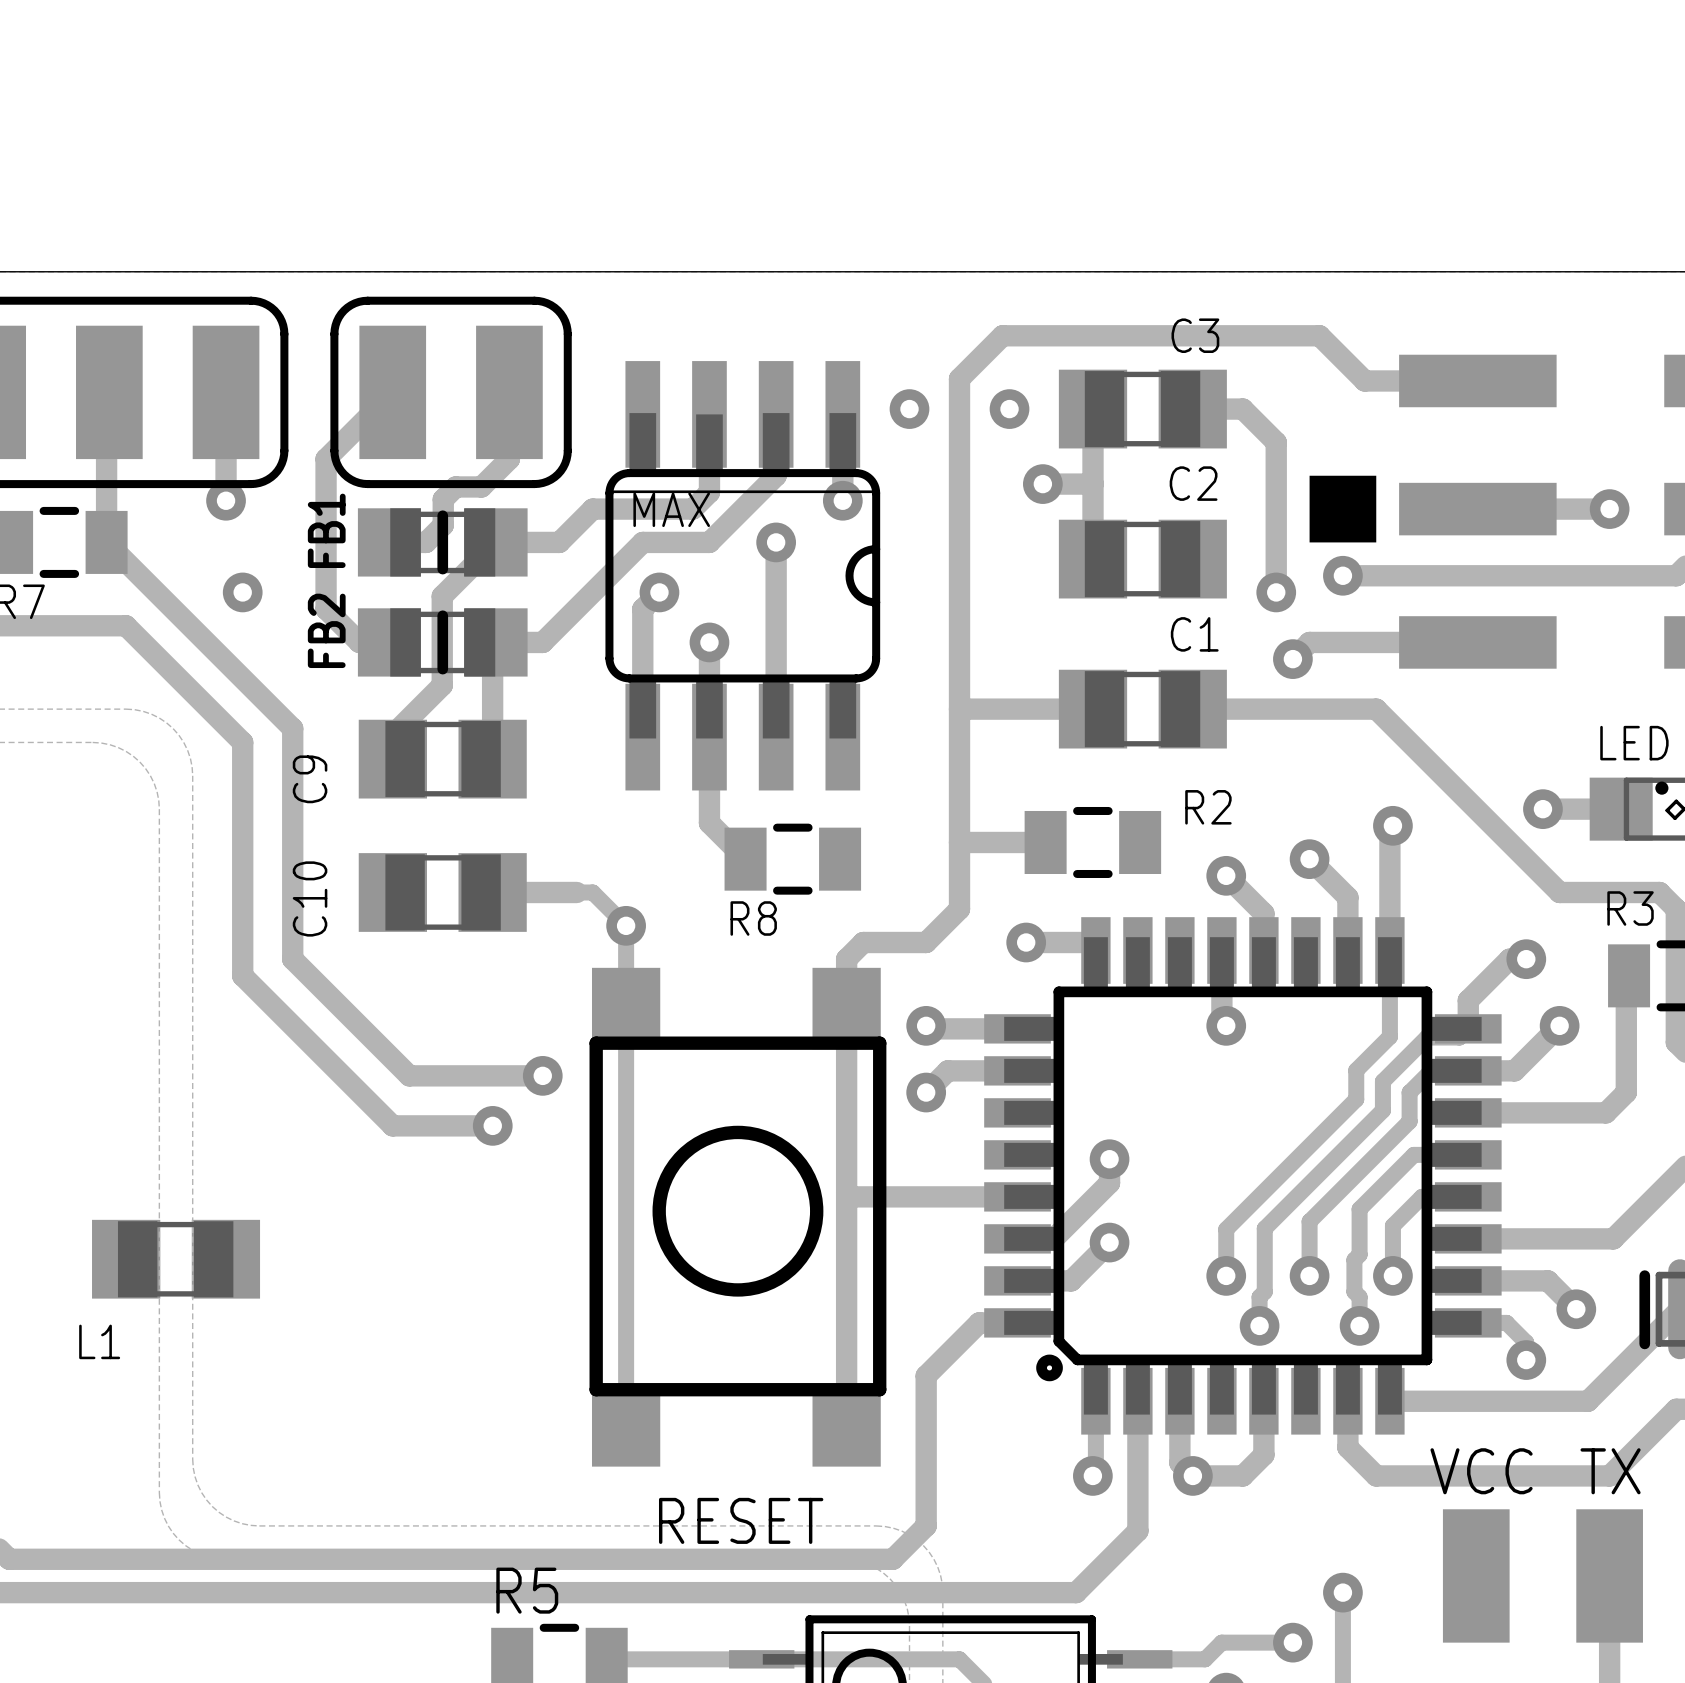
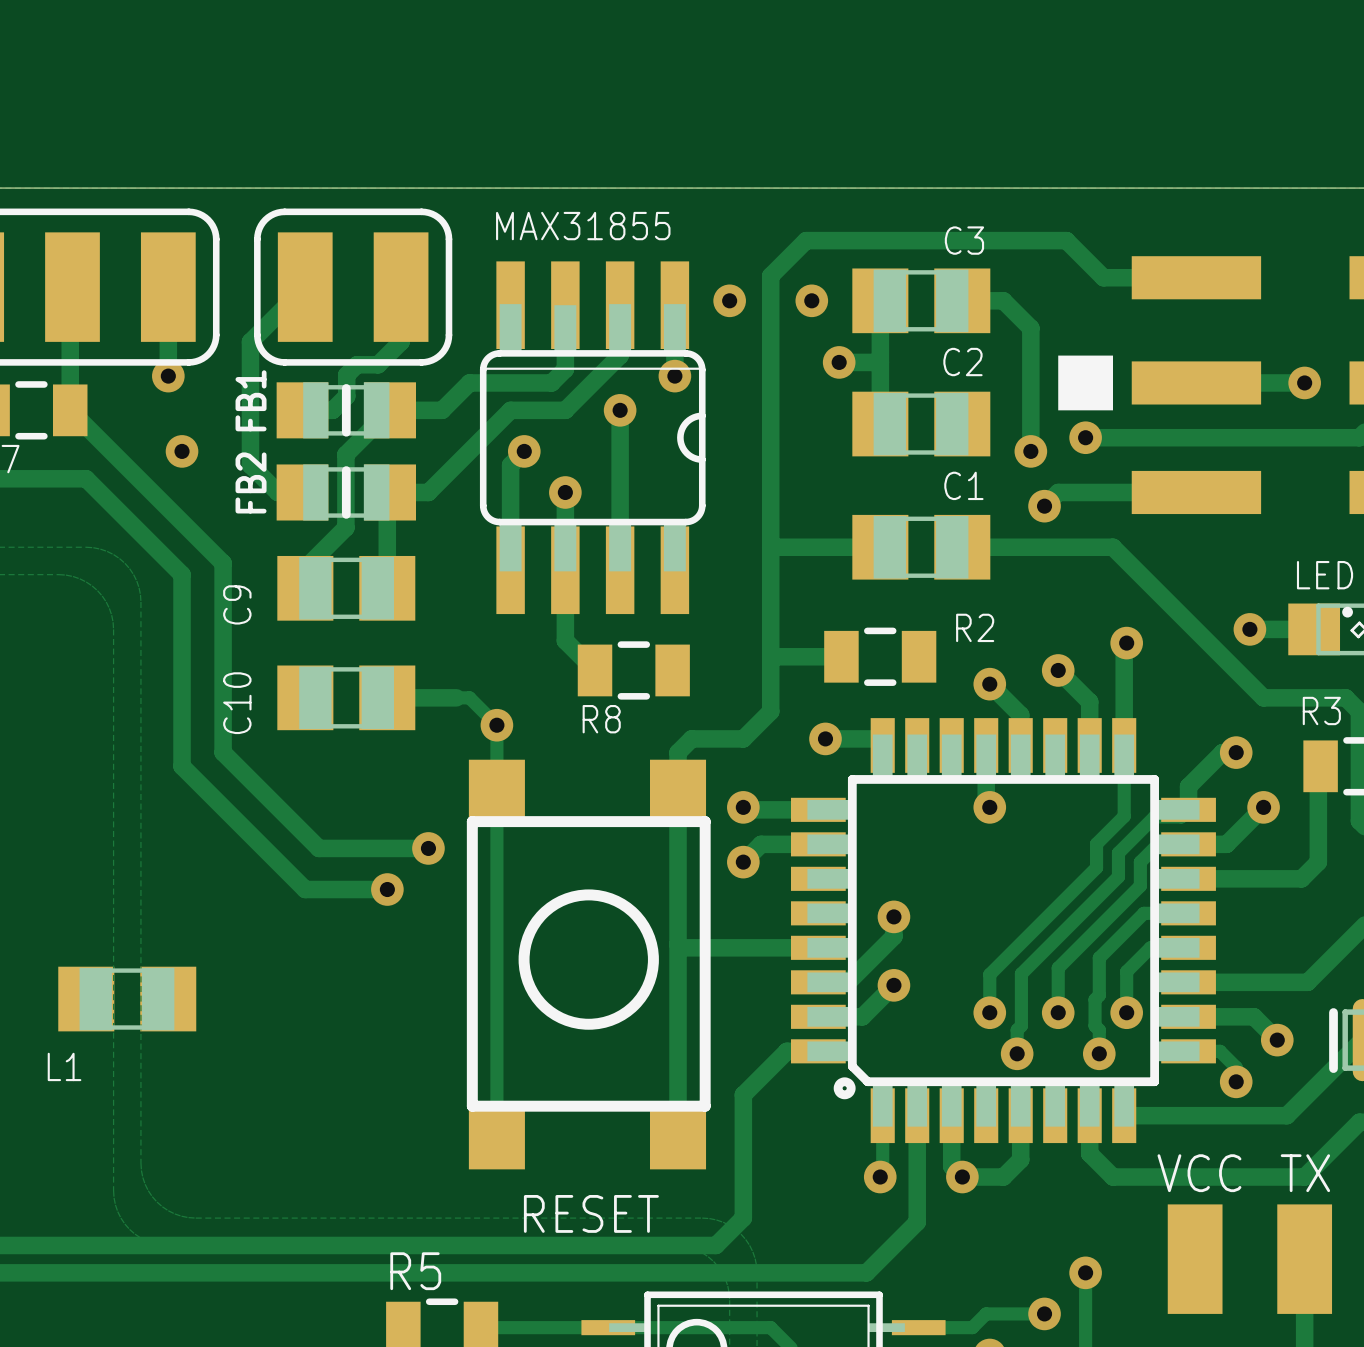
text: none -> MAX31855 (583, 226)
text: MAX (671, 509) -> none

